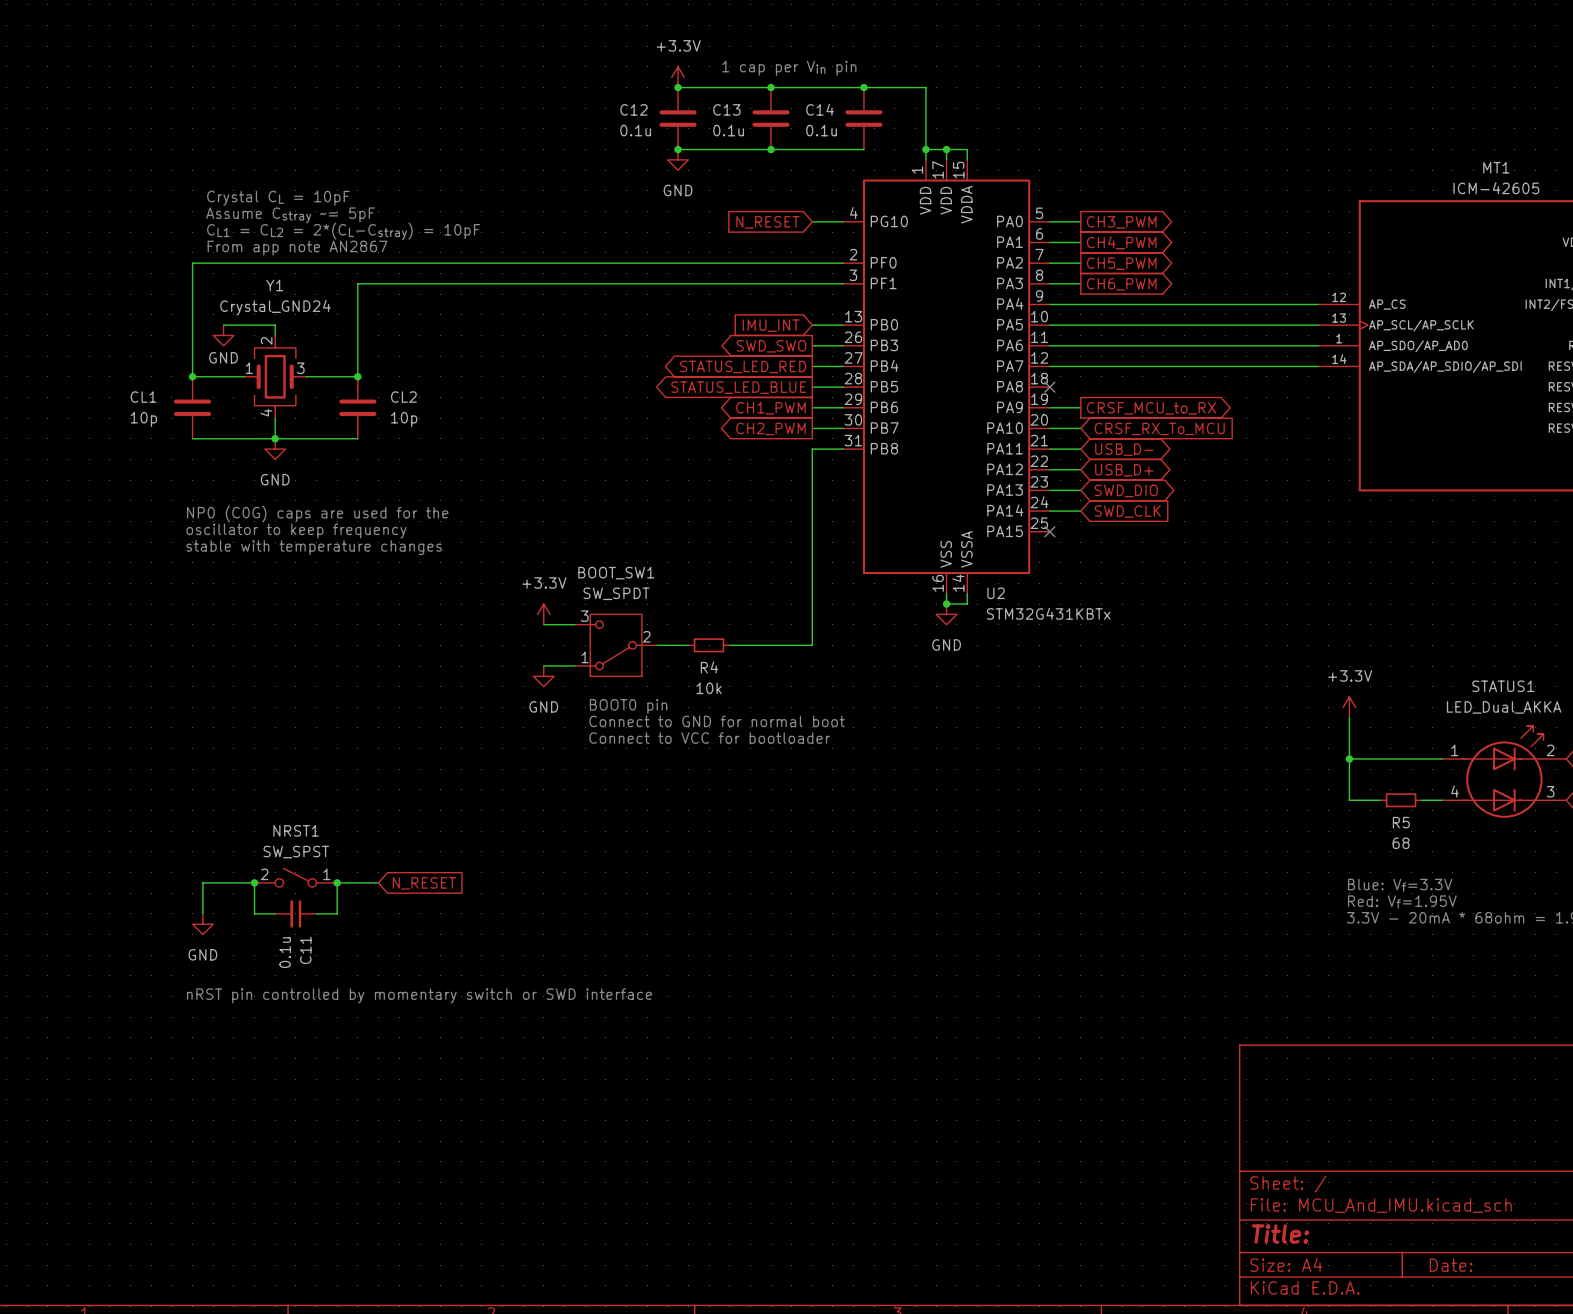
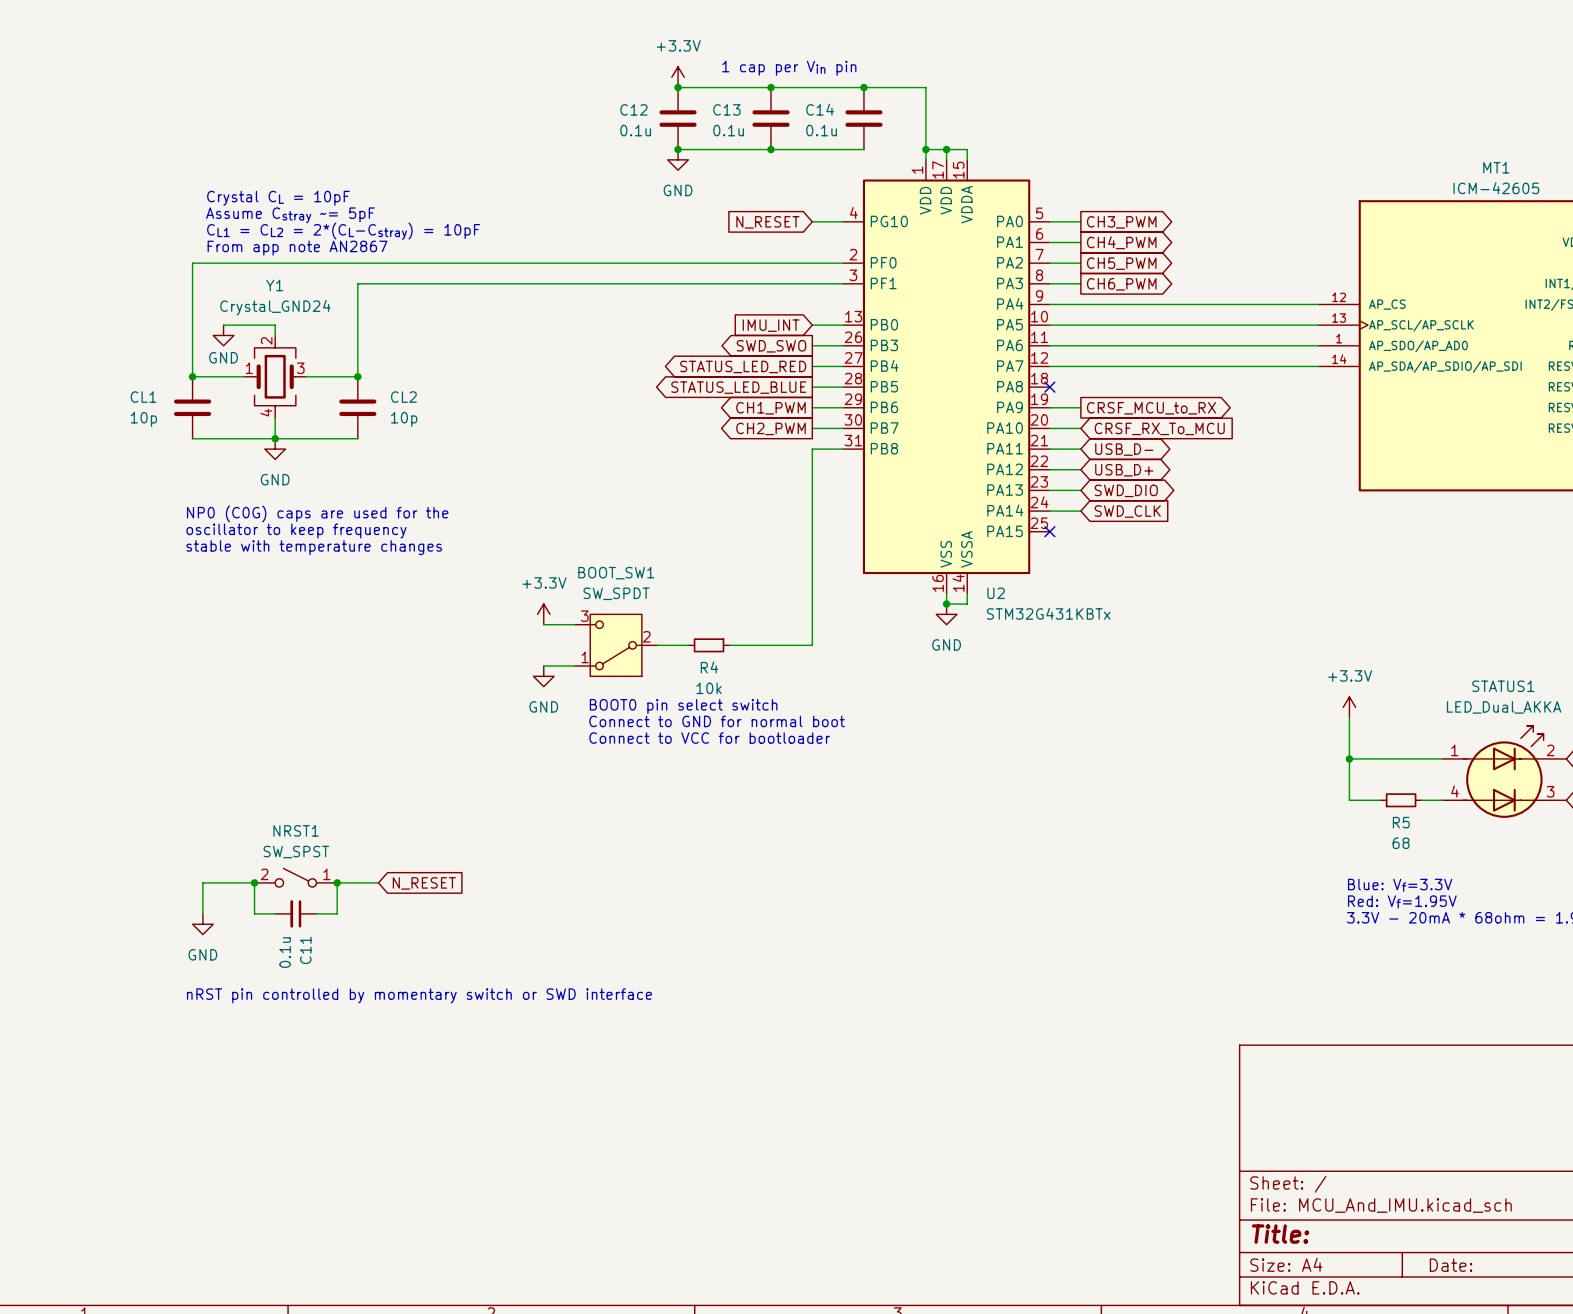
text: BOOT0 pin (628, 706) -> BOOT0 pin select switch (683, 706)

